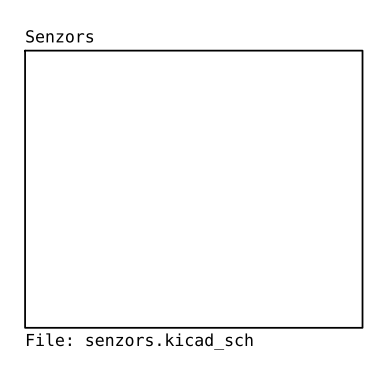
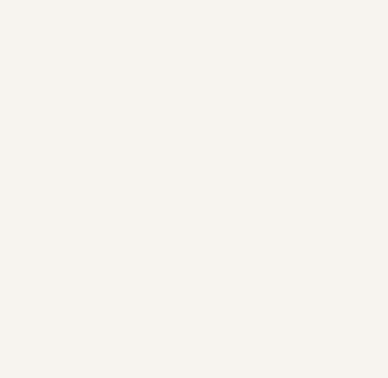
sheet Senzors: File: senzors.kicad_sch (193, 189) -> none

